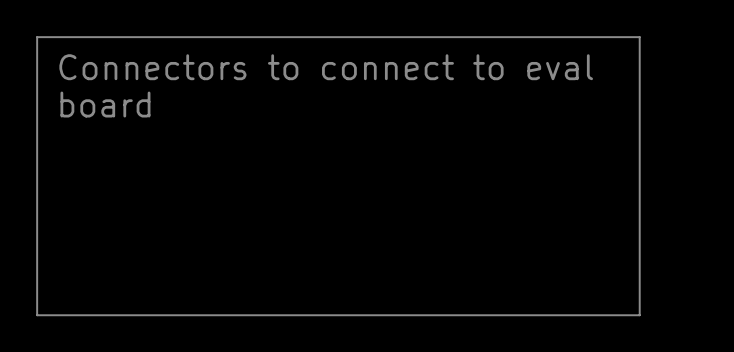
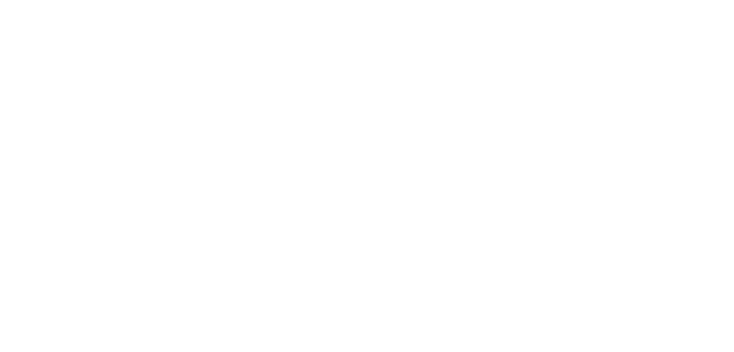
line: (37, 37) (639, 37) (639, 315) (37, 315) (37, 37) -> none
text: Connectors to connect to eval (326, 67) -> none
text: board (105, 104) -> none

